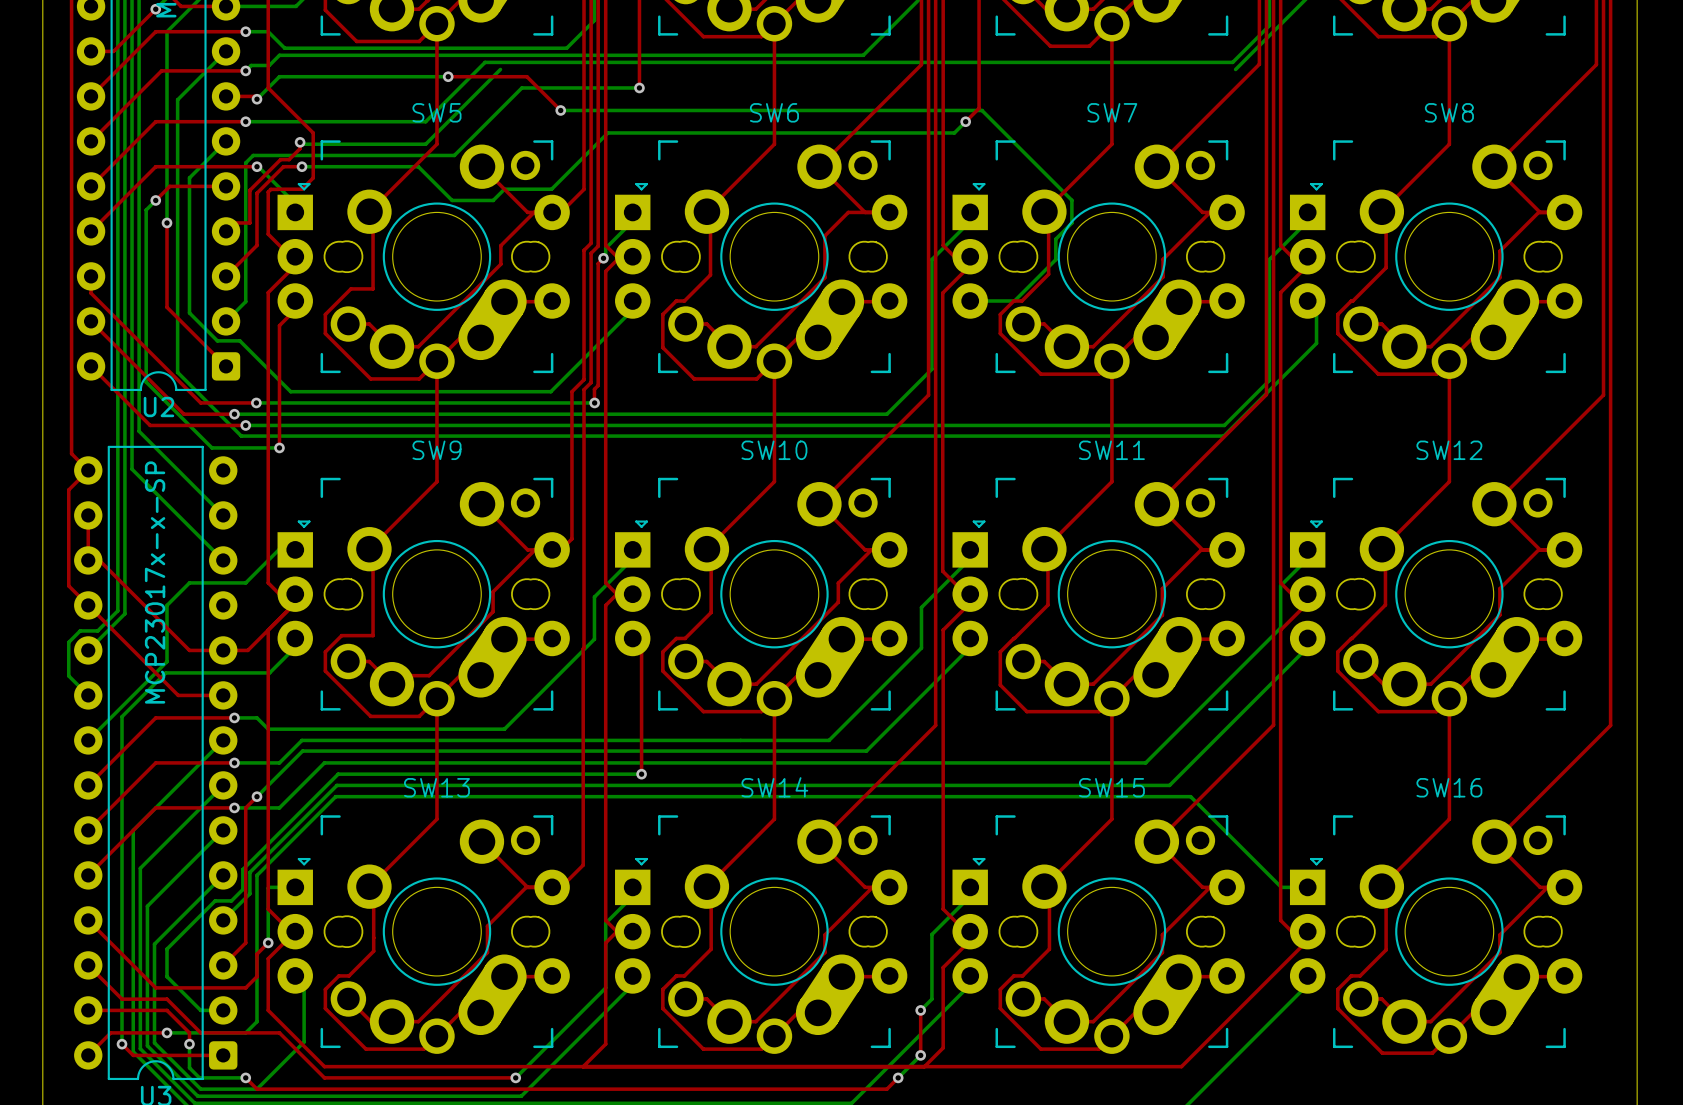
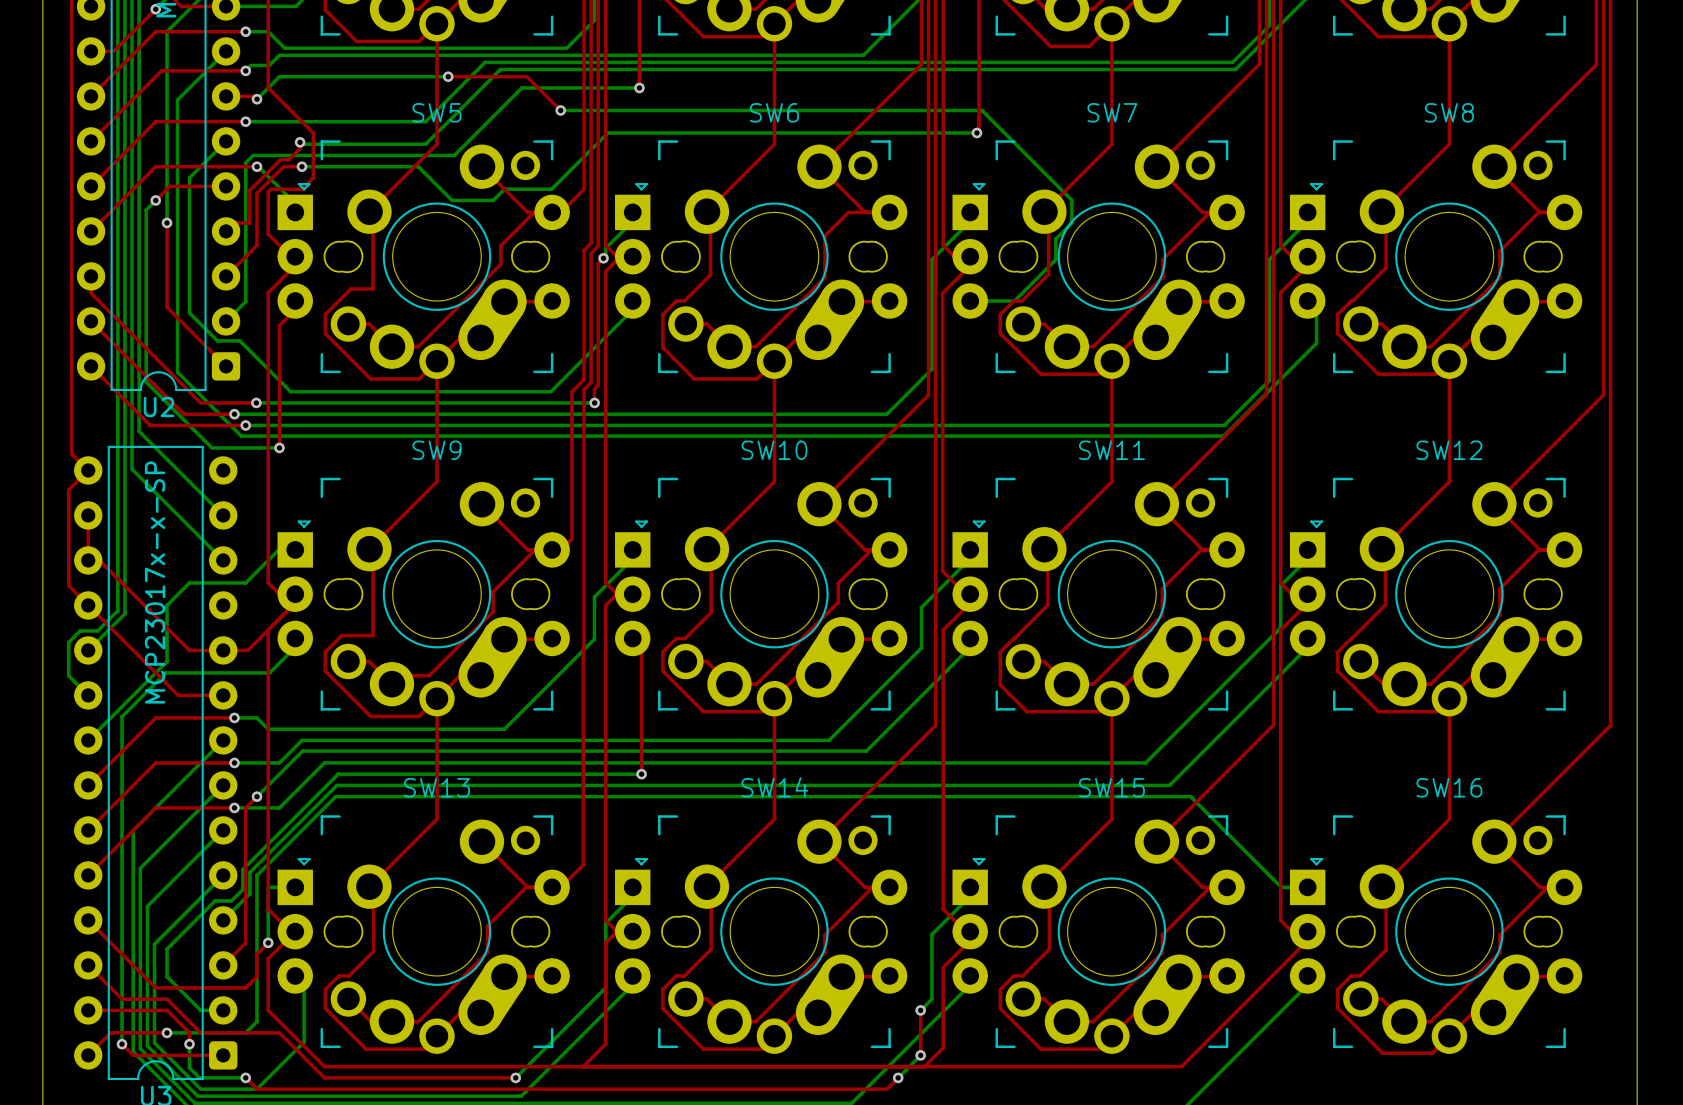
bottom track: none -> (500, 69) (1235, 69)
top track: (979, 108) (965, 121) -> (979, 108) (979, 130) (976, 132)
bottom track: (965, 121) (954, 132) -> (976, 132) (954, 132)
via position: (965, 121) -> (976, 132)

